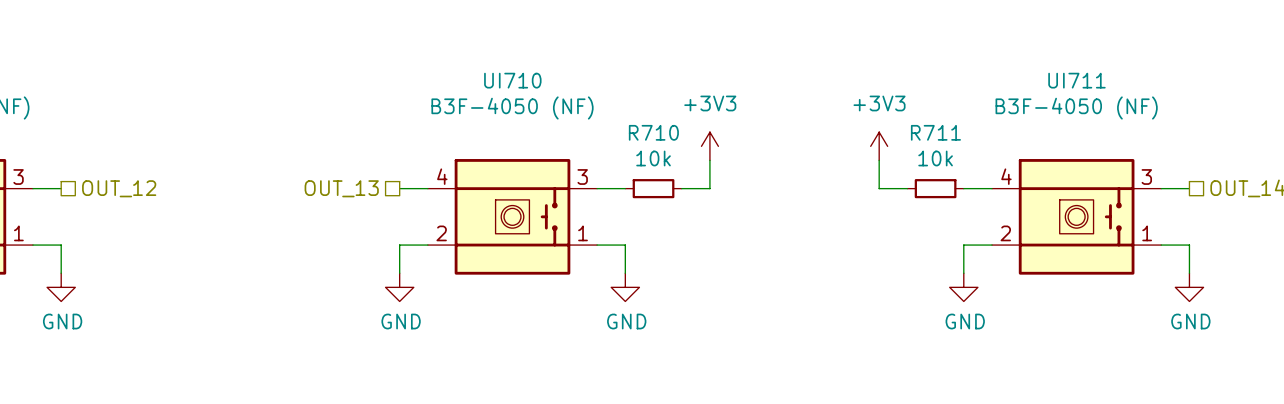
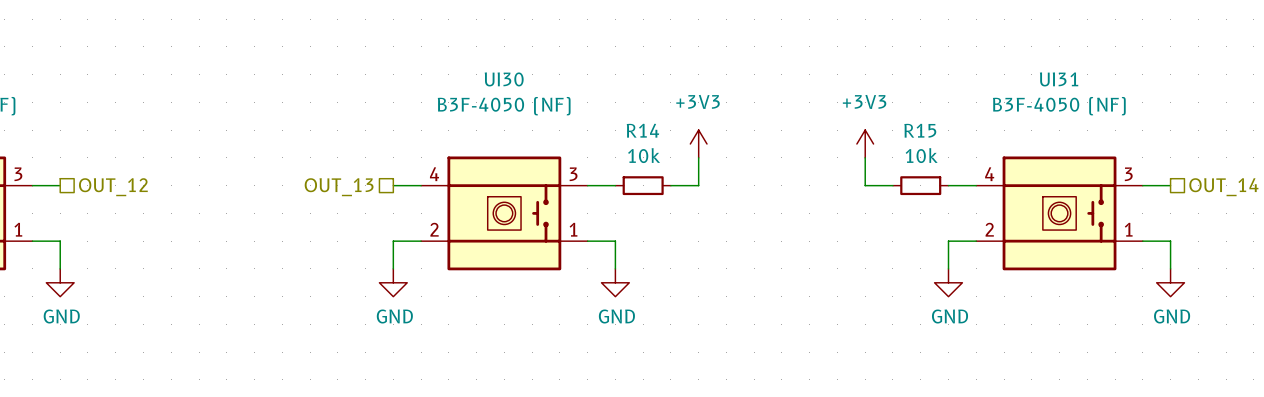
UI710 name: UI710 (512, 80) -> UI30 (504, 79)
UI711 name: UI711 (1076, 80) -> UI31 (1059, 79)
R710 name: R710 (653, 132) -> R14 (642, 130)
R711 name: R711 (935, 132) -> R15 (920, 130)

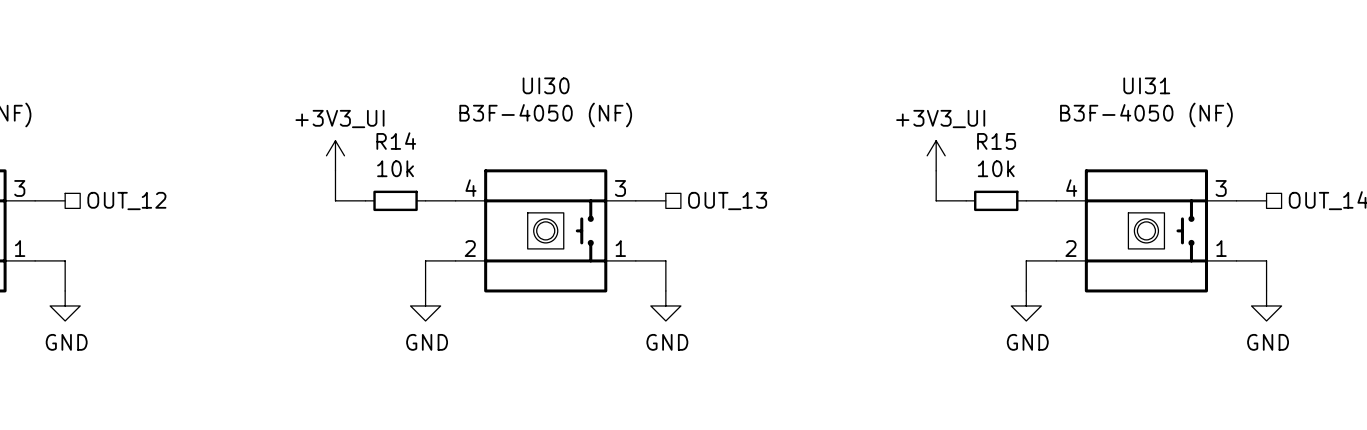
power symbol: none -> +3V3_UI (335, 155)
power symbol: +3V3 (698, 144) -> none
power symbol: +3V3 (865, 144) -> +3V3_UI (936, 155)
wire: none -> (335, 170) (335, 200) (365, 200)
wire: (698, 157) (698, 185) (670, 185) -> none
R14 position: (643, 185) -> (395, 200)
hierarchical label rotation: 0° (339, 187) -> 180° (727, 201)
hierarchical label position: OUT_13 (339, 187) -> OUT_13 (727, 201)

